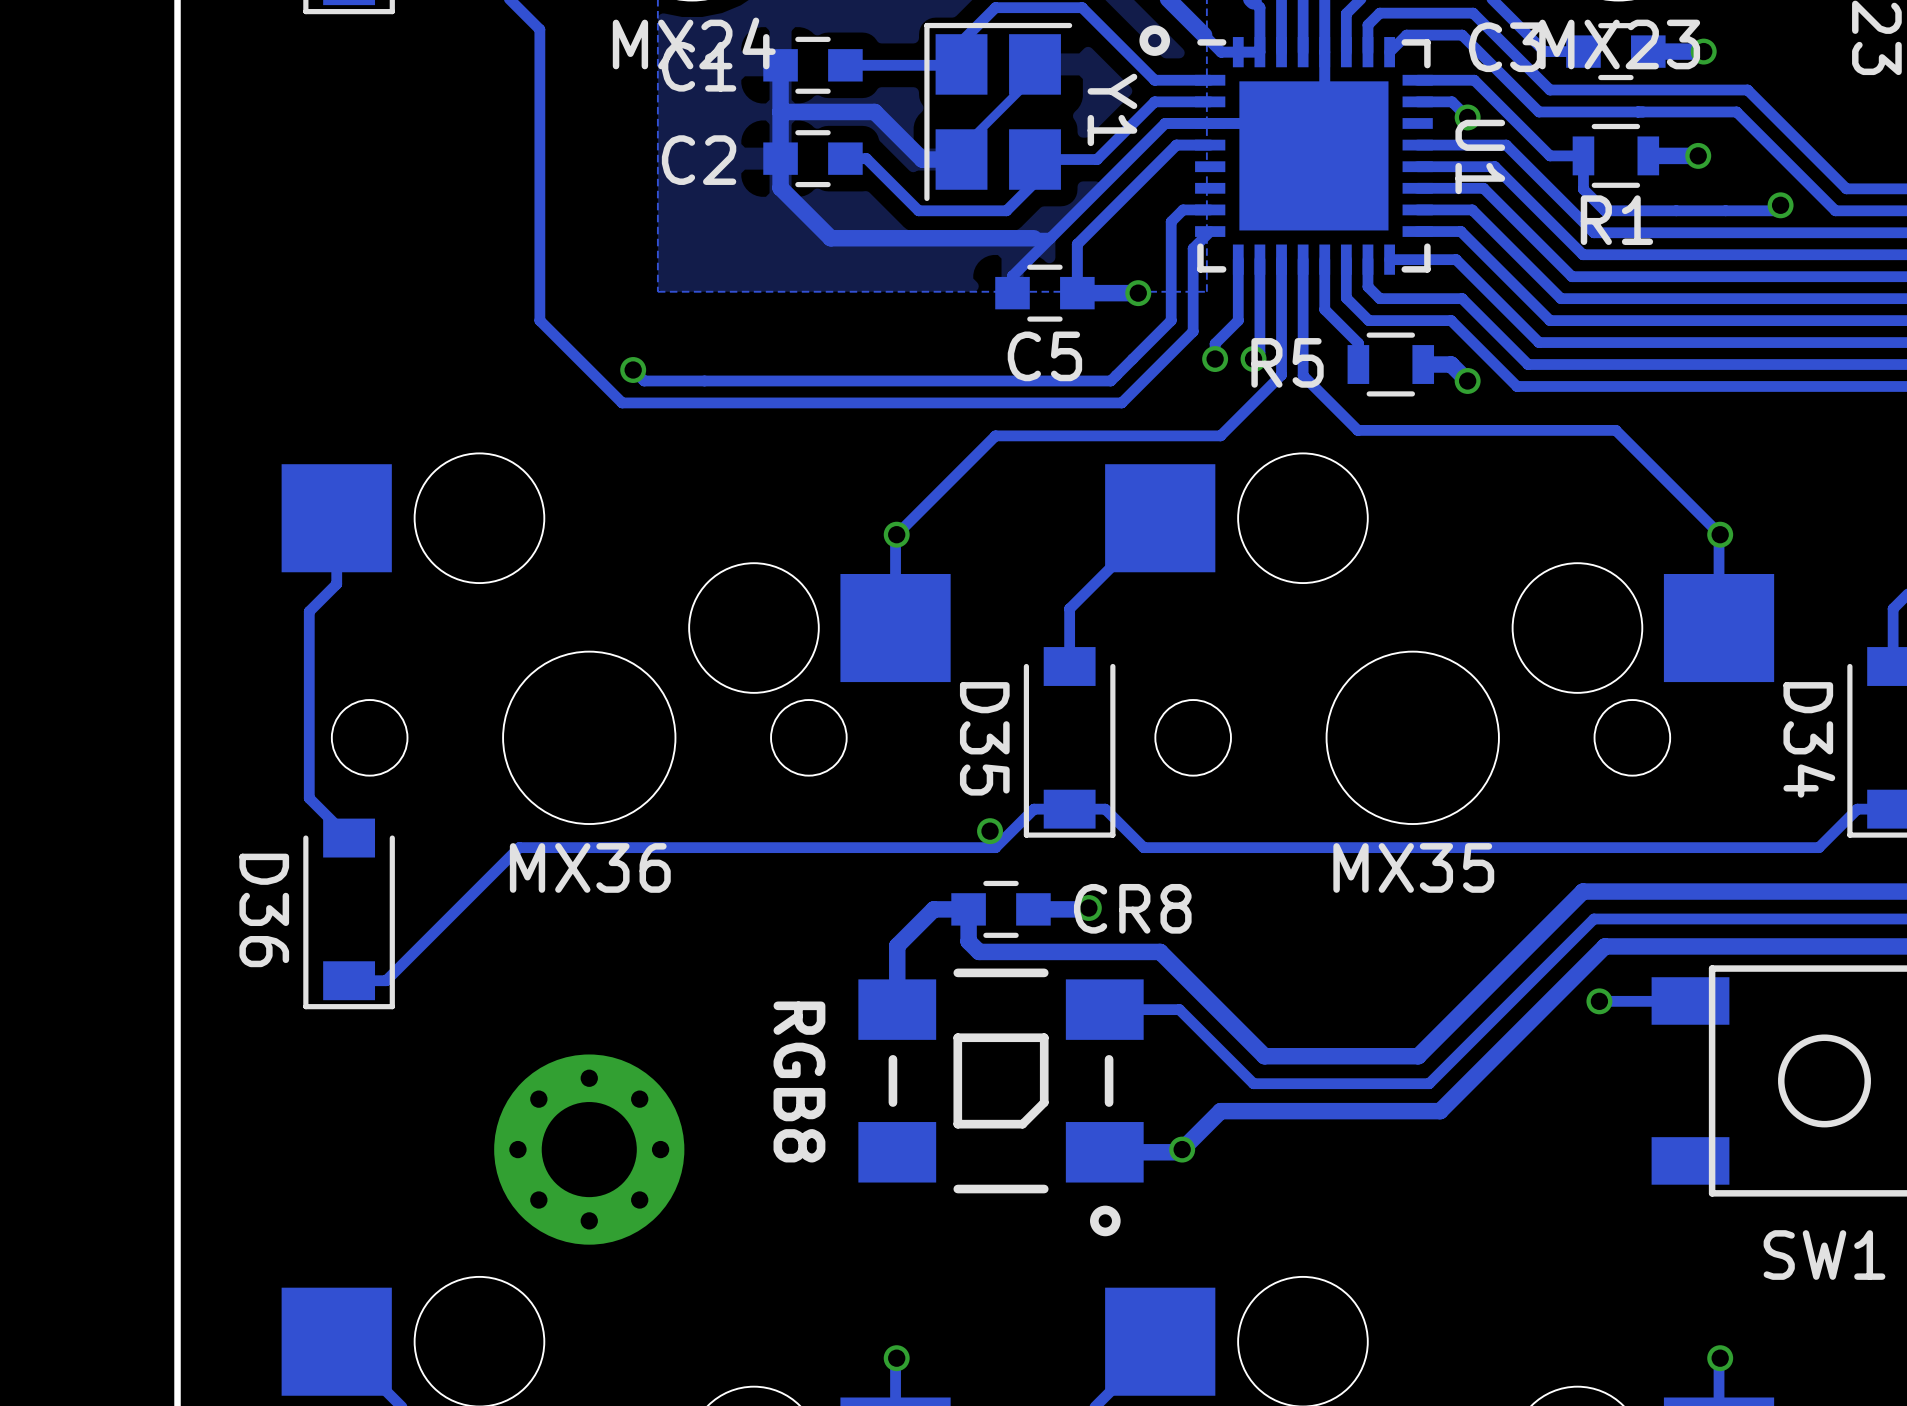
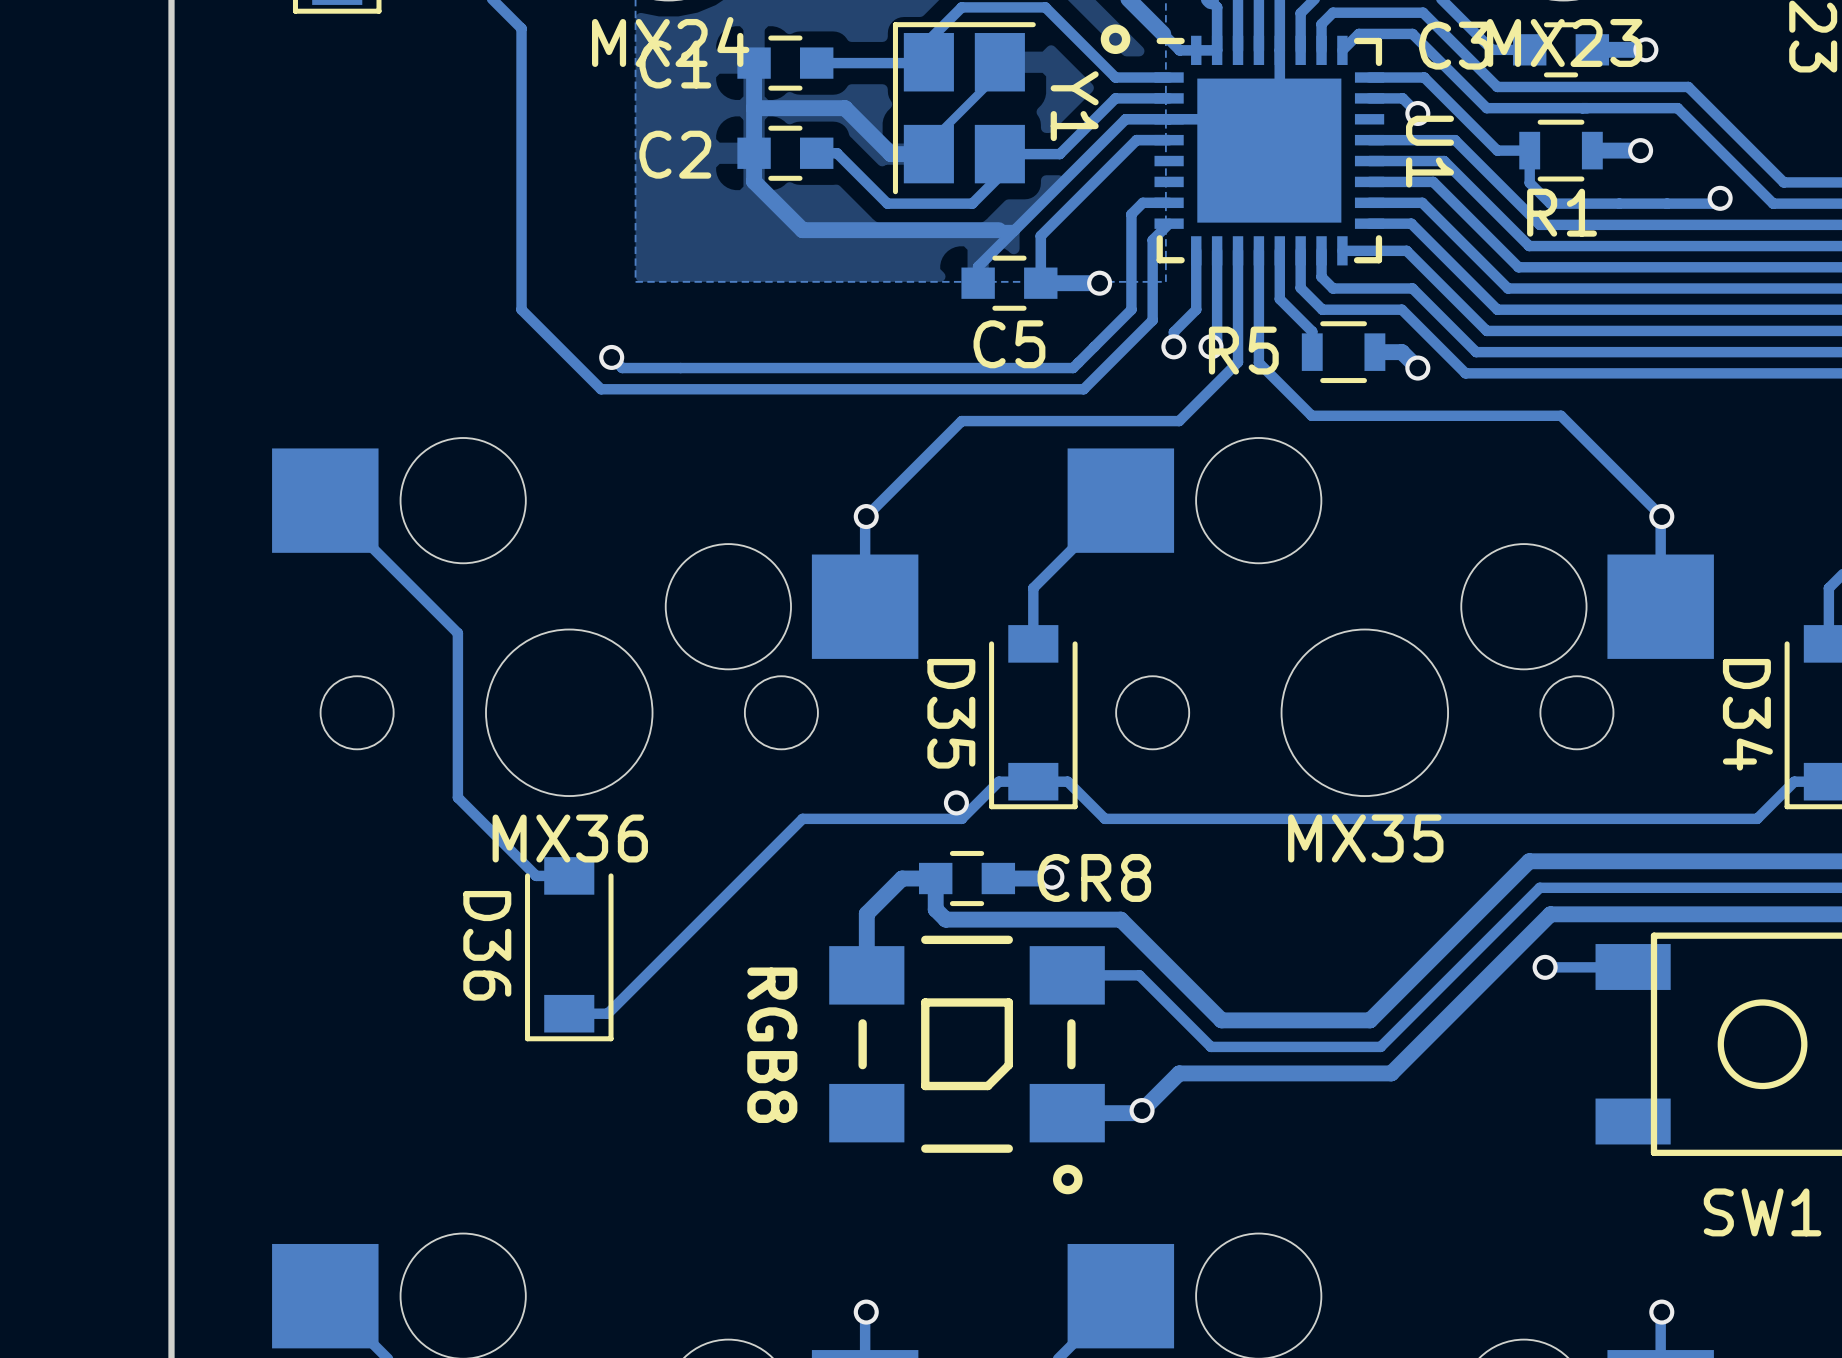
track: (336, 518) (336, 584) (309, 611) (309, 798) (349, 838) -> (325, 500) (457, 633) (457, 797) (536, 875) (569, 875)
track: (830, 847) (519, 847) (386, 980) (349, 980) -> (802, 818) (607, 1013) (569, 1013)
D36 position: (349, 913) -> (569, 949)
part: (589, 1149) -> none

